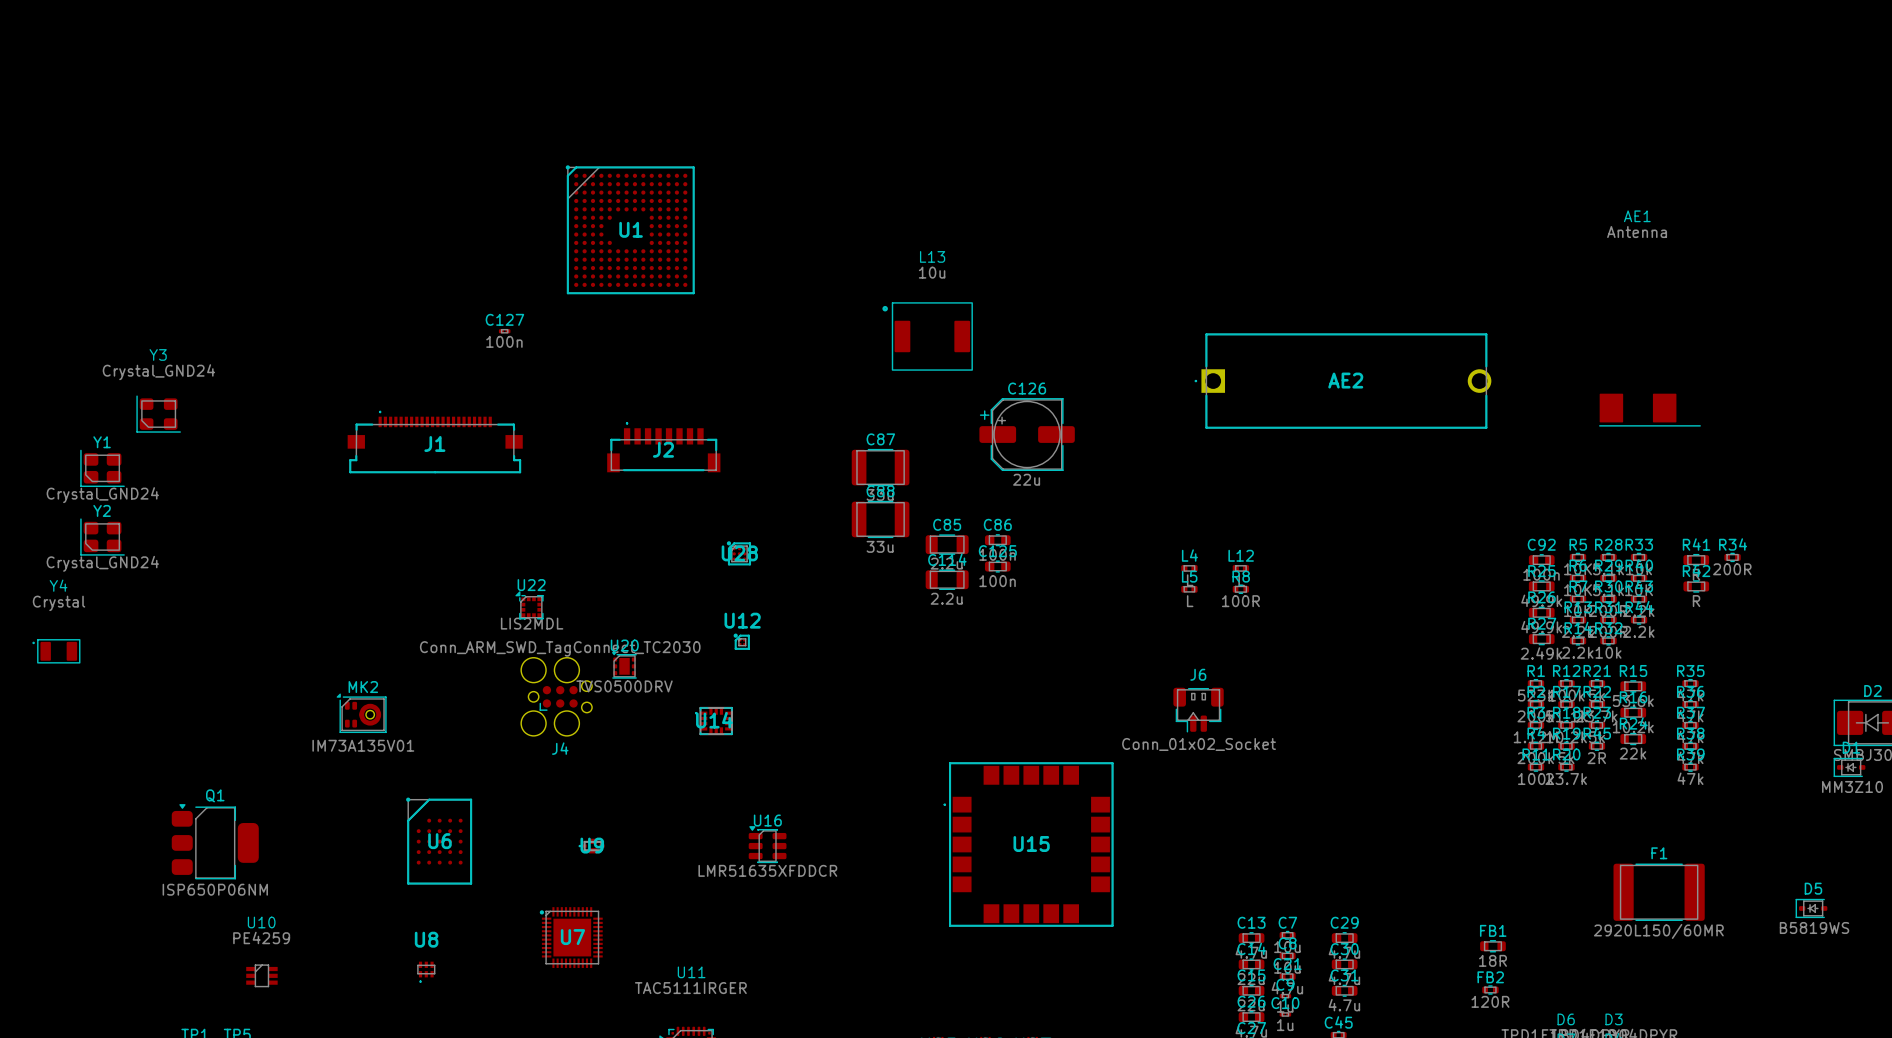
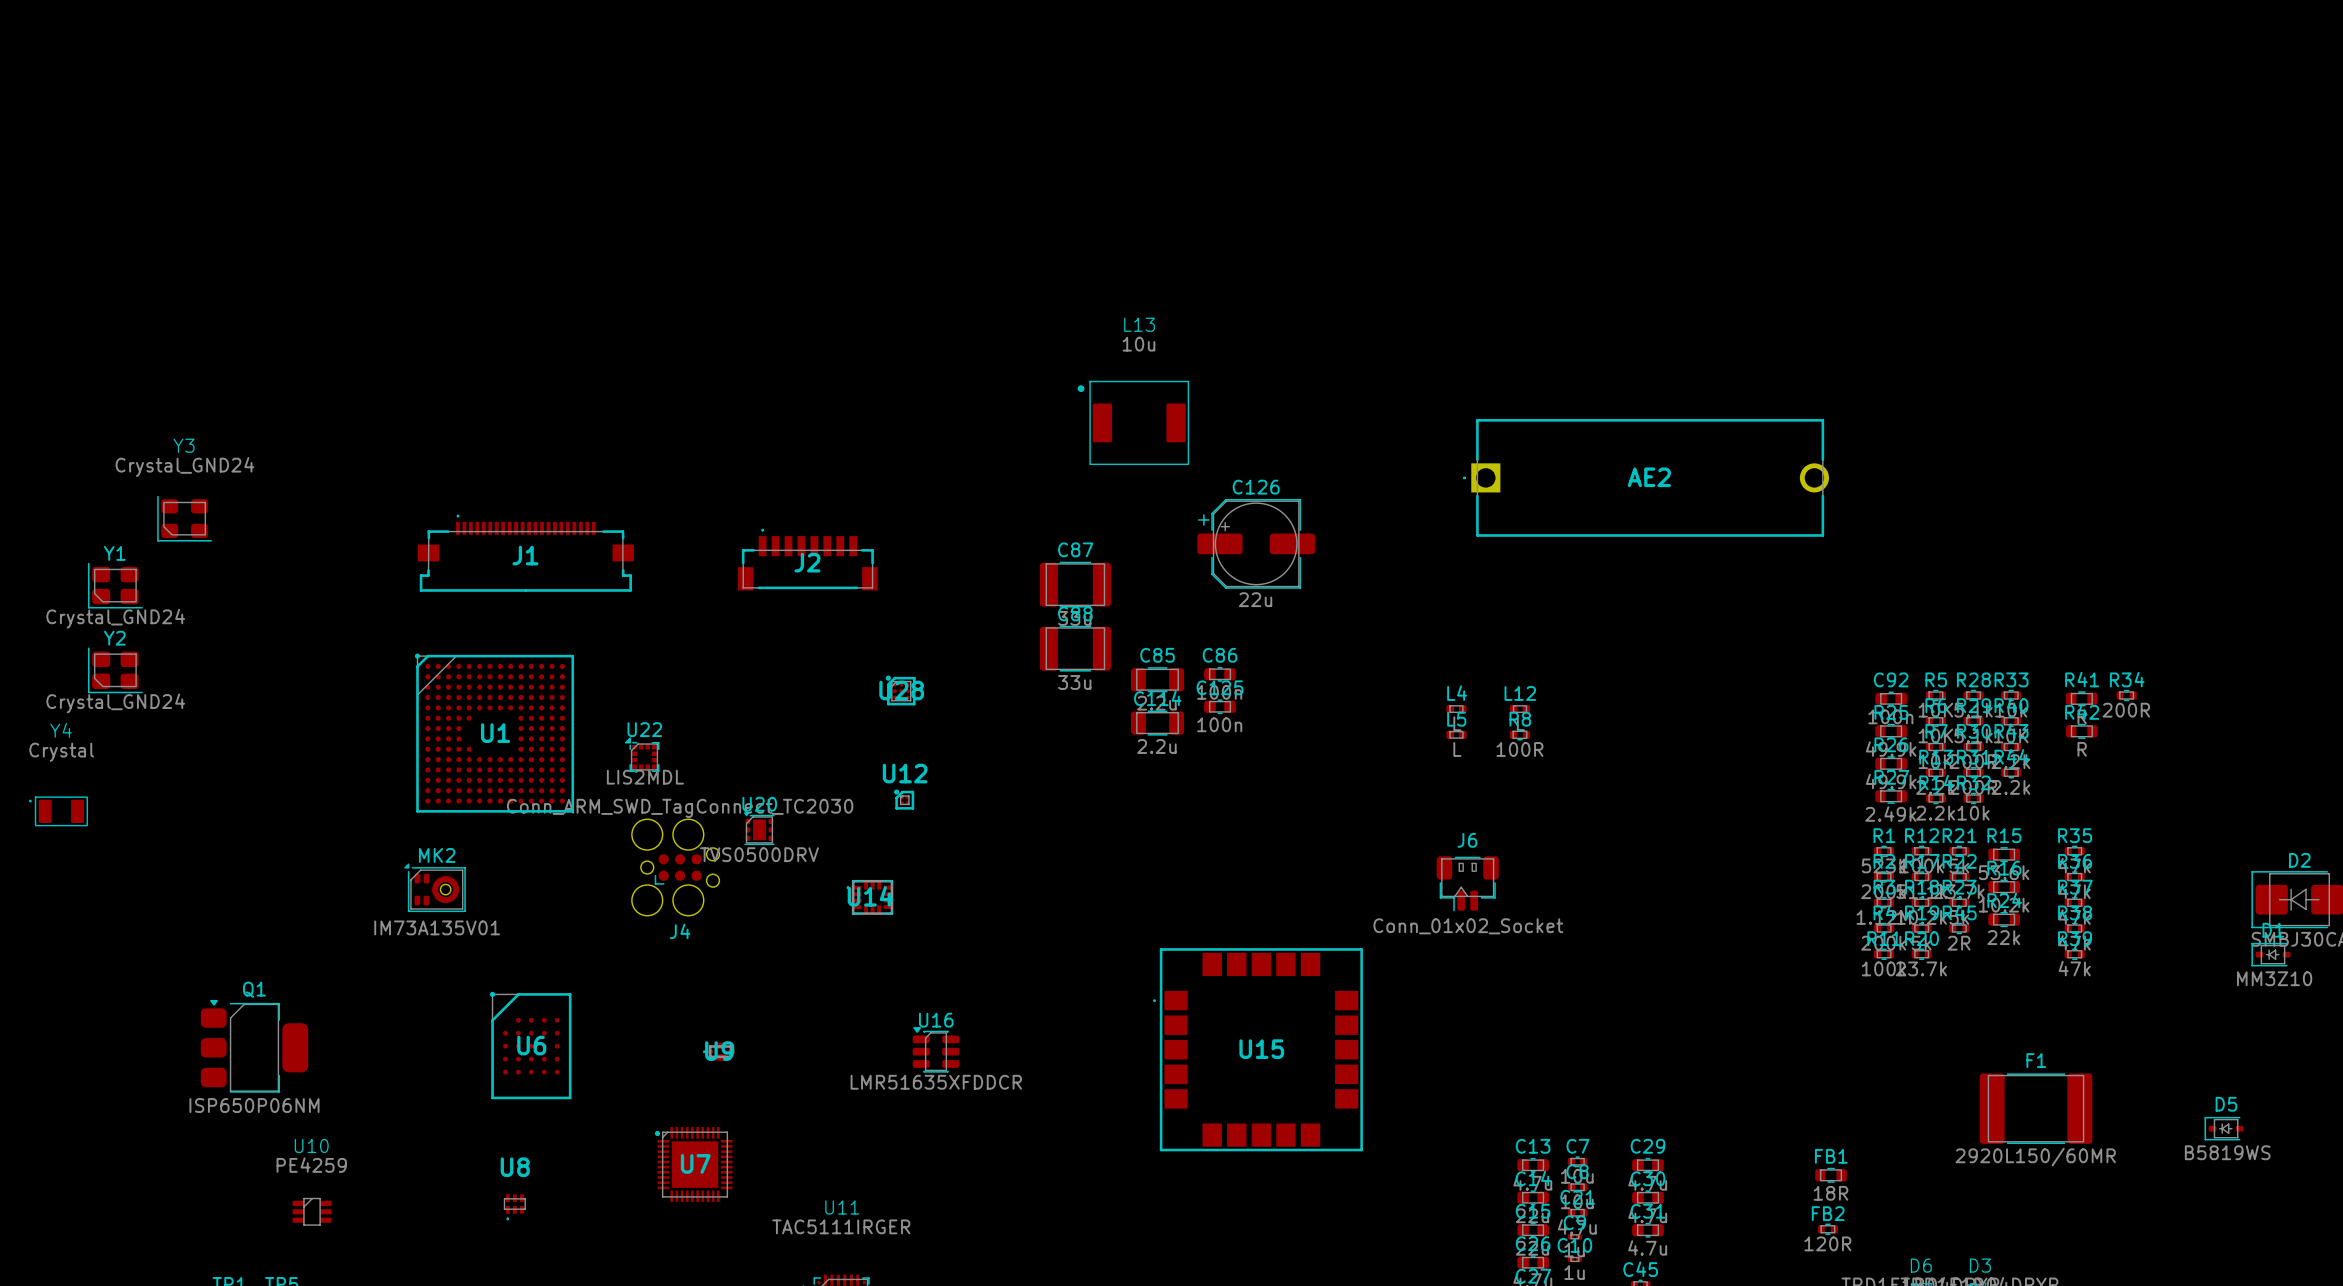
U1 position: (630, 229) -> (494, 733)
C127: 100n (504, 331) -> none
AE1: Antenna (1649, 410) -> none

